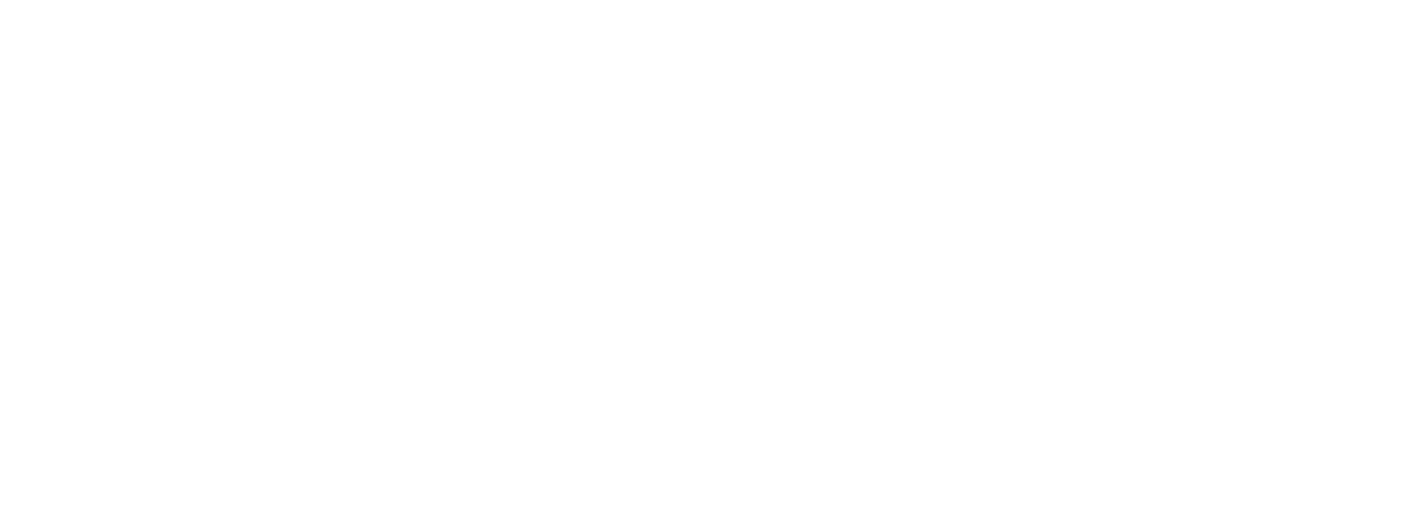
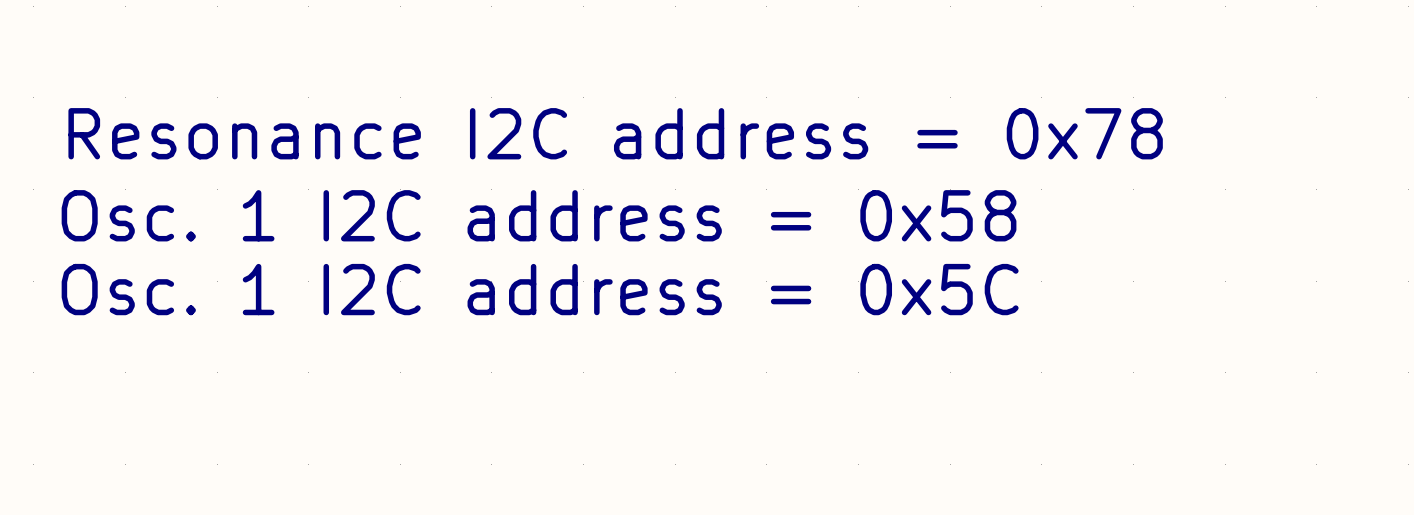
text: none -> Resonance I2C address = 0x78 (615, 133)
text: none -> Osc. 1 I2C address = 0x58 (539, 215)
text: none -> Osc. 1 I2C address = 0x5C (540, 289)

